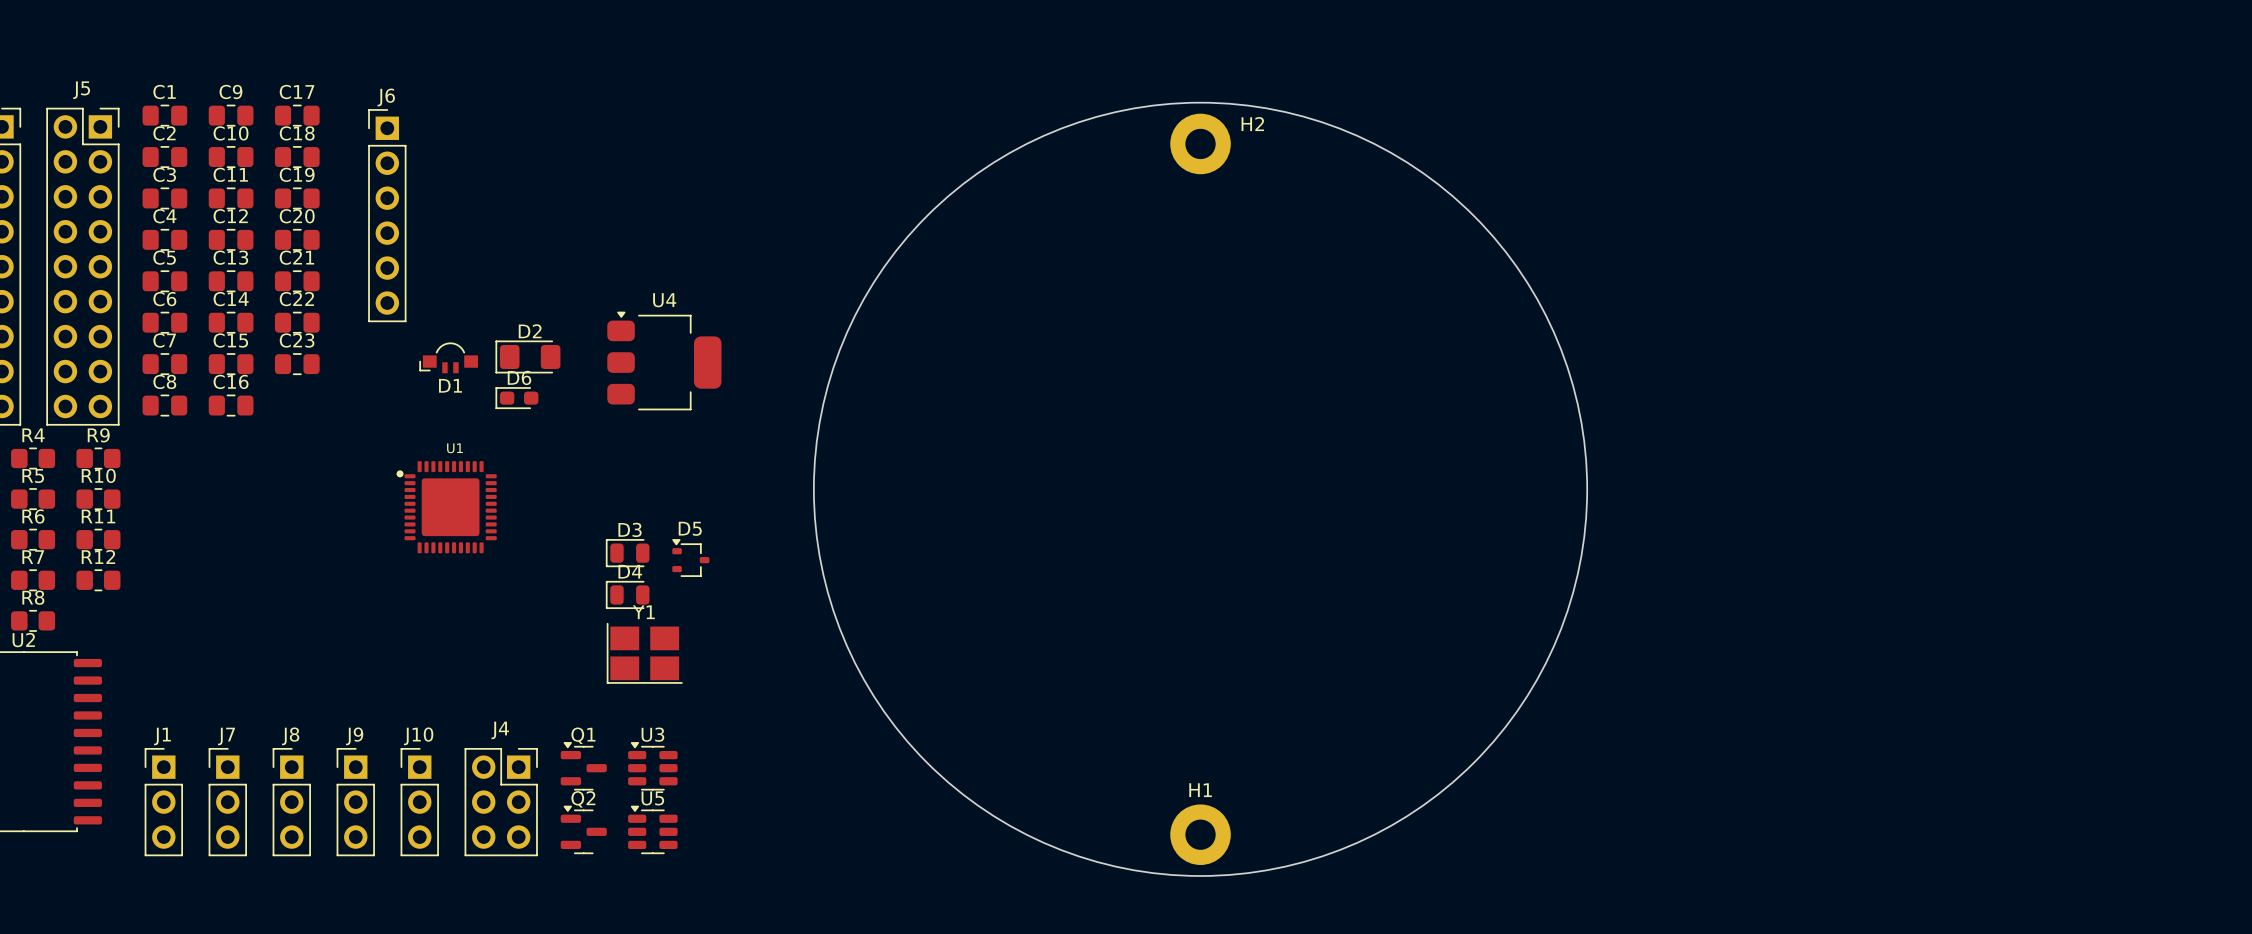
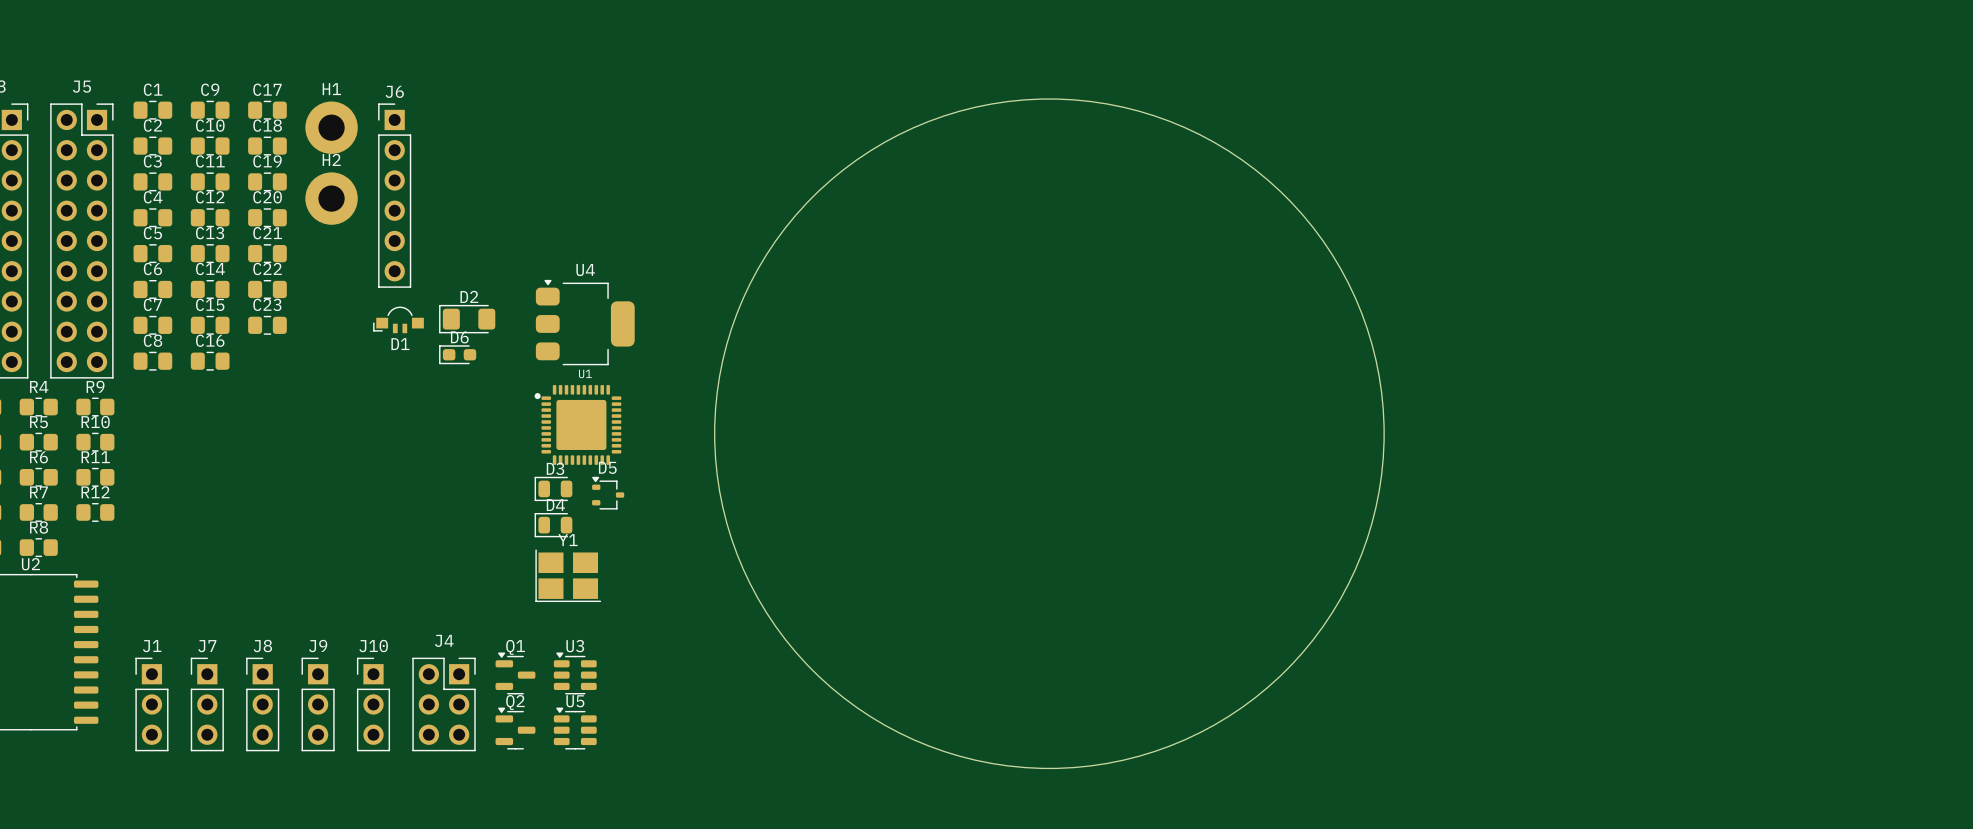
H2 name position: H2 (1252, 124) -> H2 (331, 159)
H2 position: (1200, 143) -> (331, 198)
J6 position: (387, 215) -> (394, 195)
U1 position: (446, 507) -> (577, 424)
H1 position: (1200, 834) -> (331, 127)

